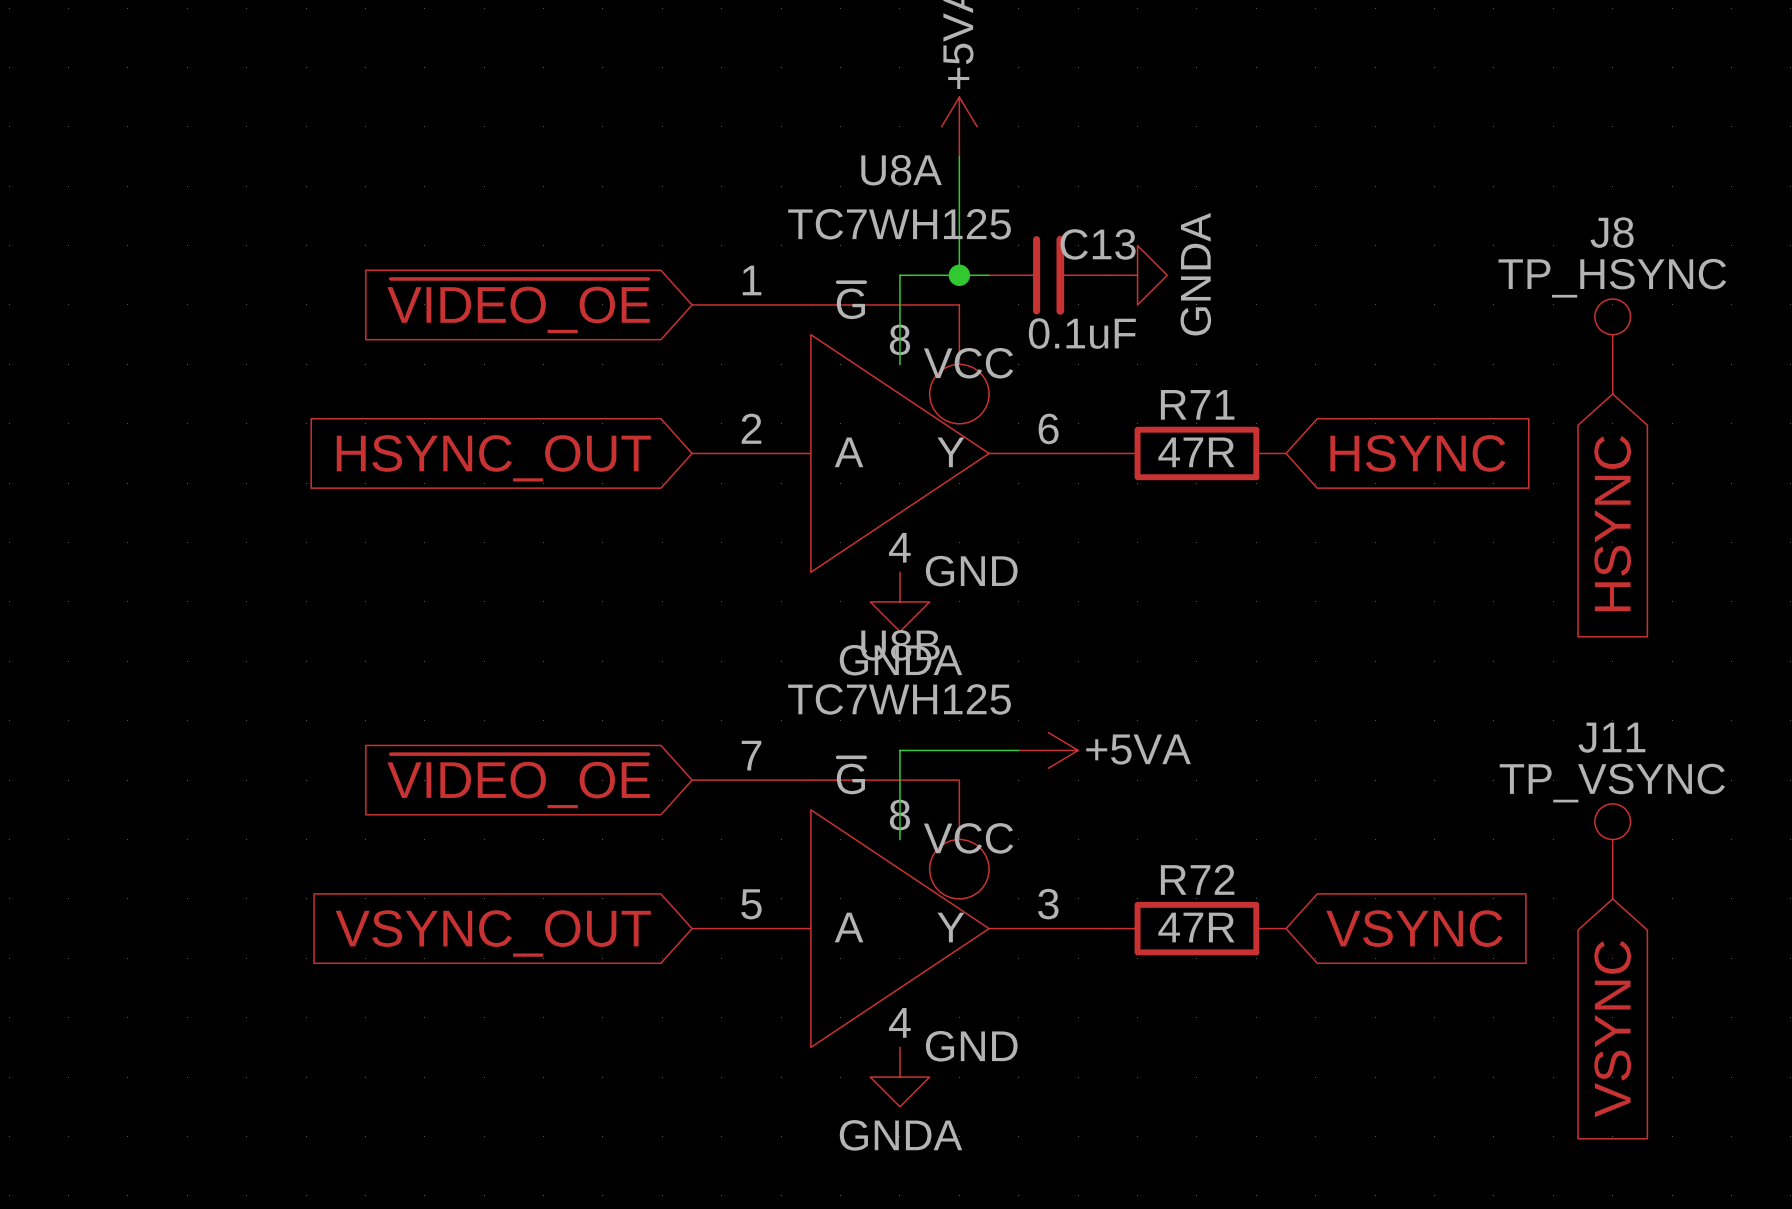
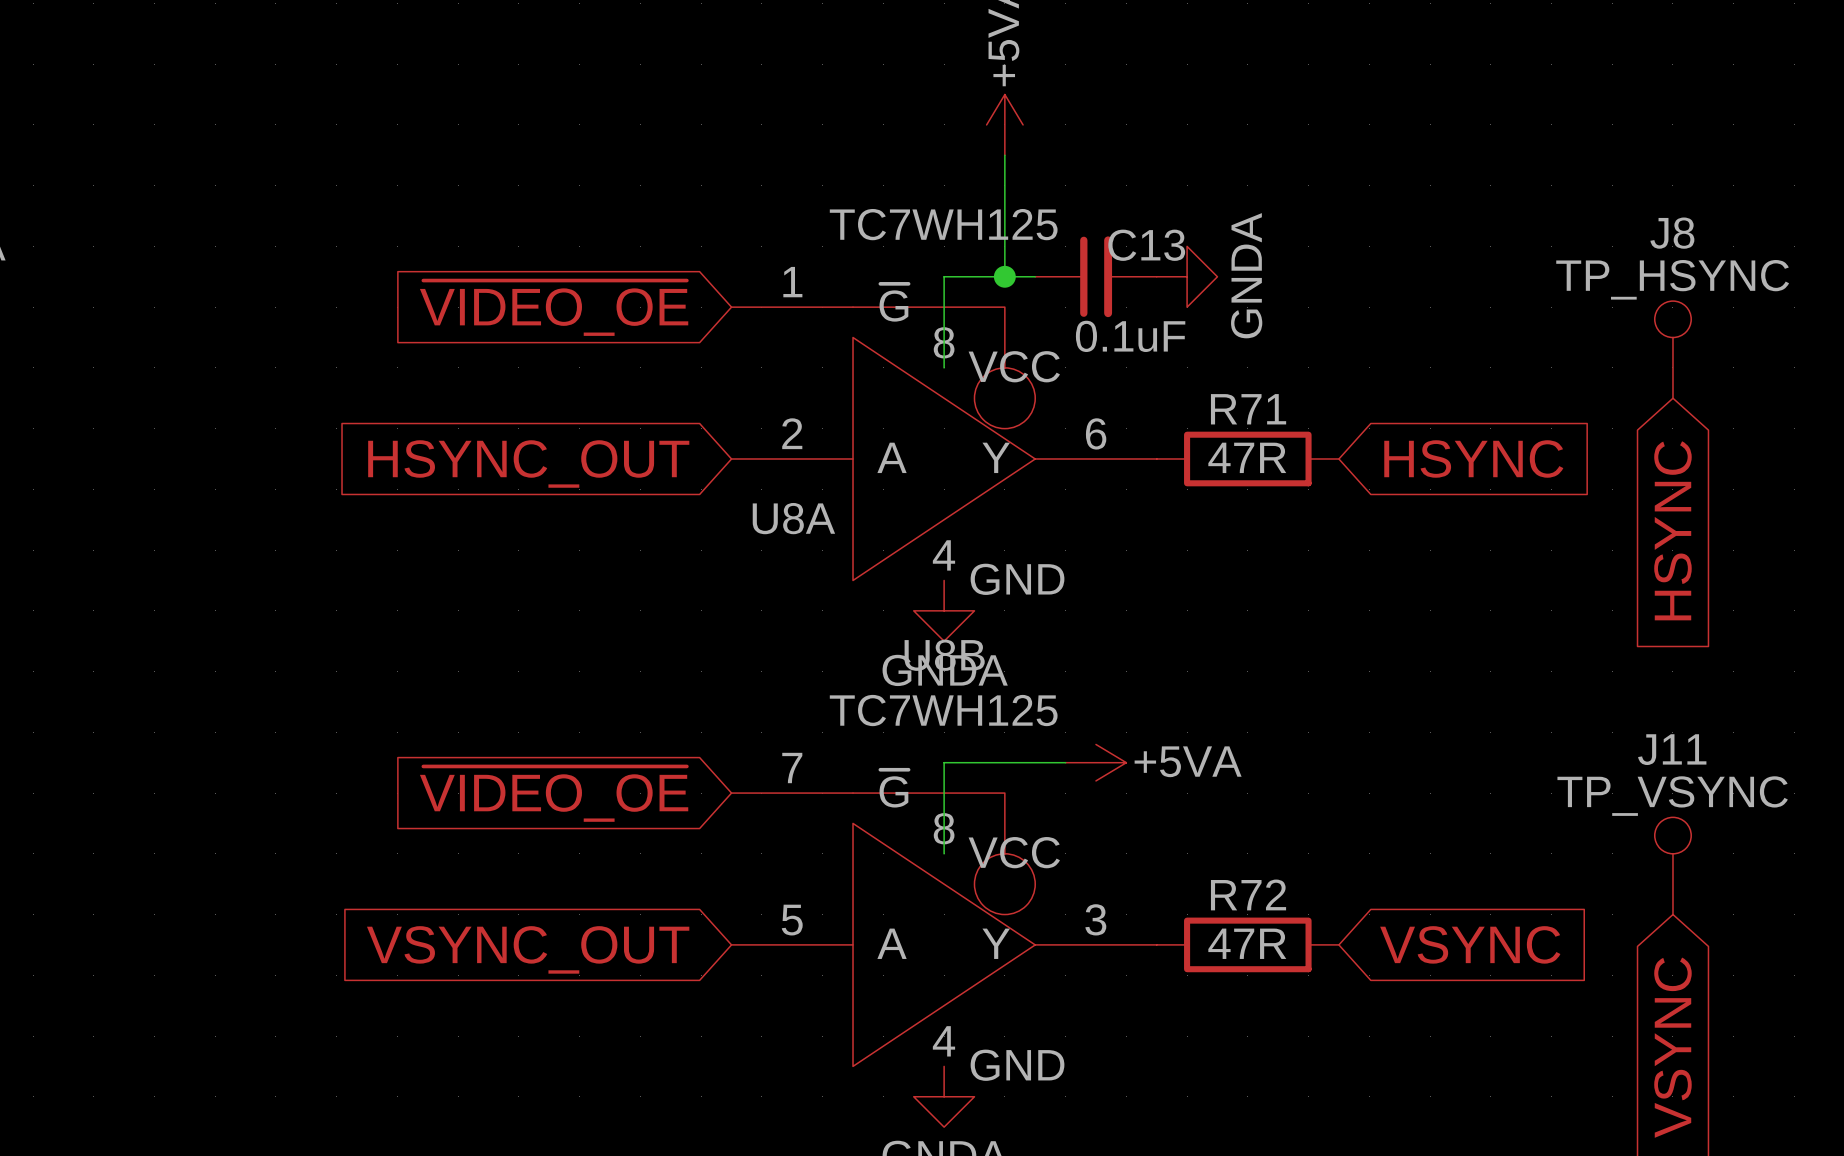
U8A name position: U8A (901, 170) -> U8A (793, 518)

